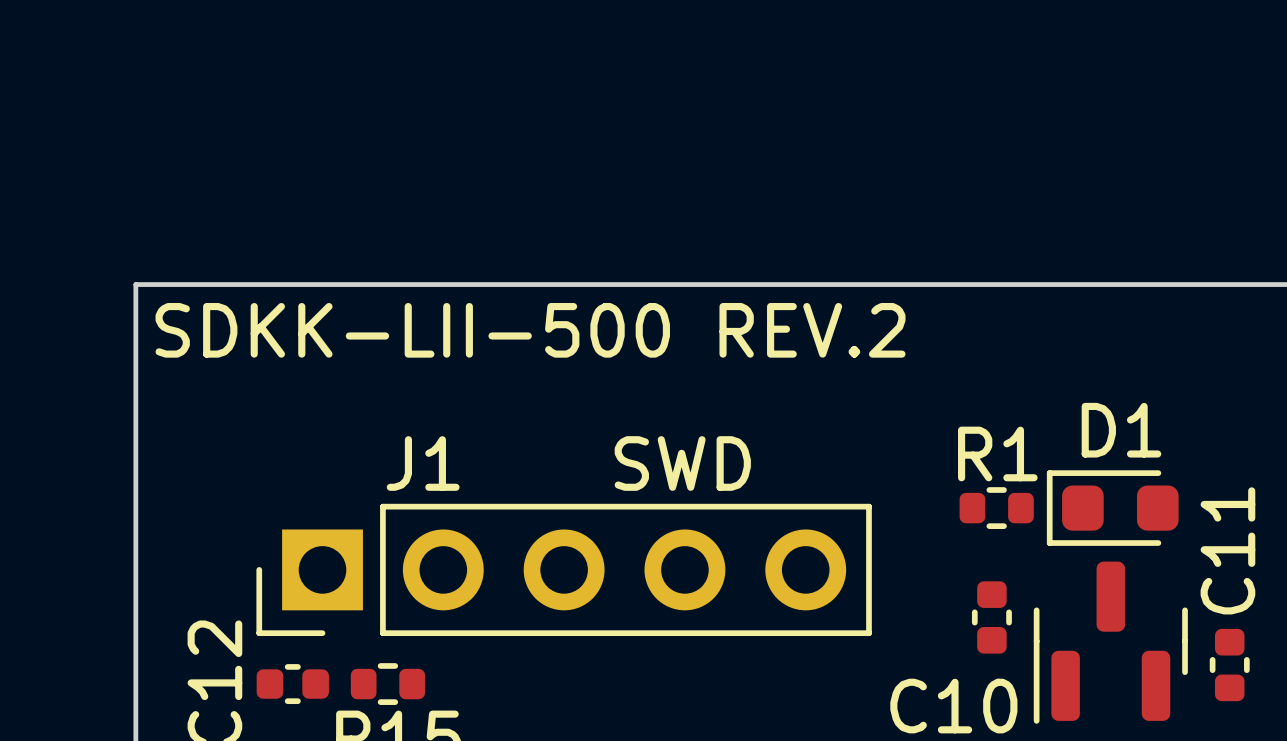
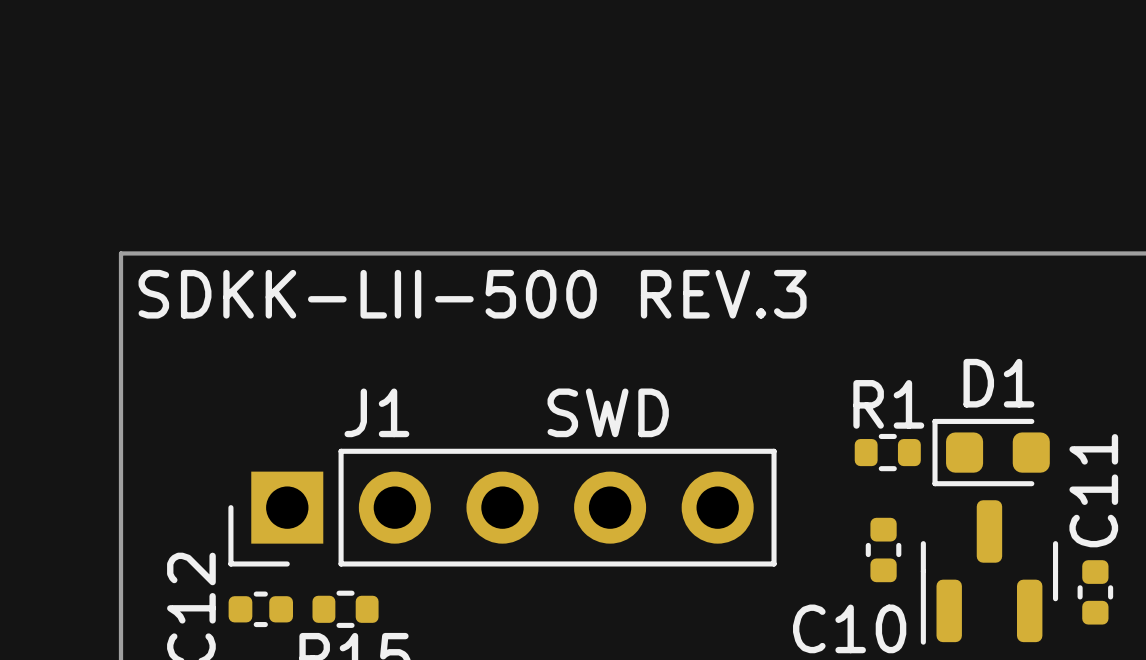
text: SDKK-LII-500 REV.2 (530, 330) -> SDKK-LII-500 REV.3 (472, 294)

